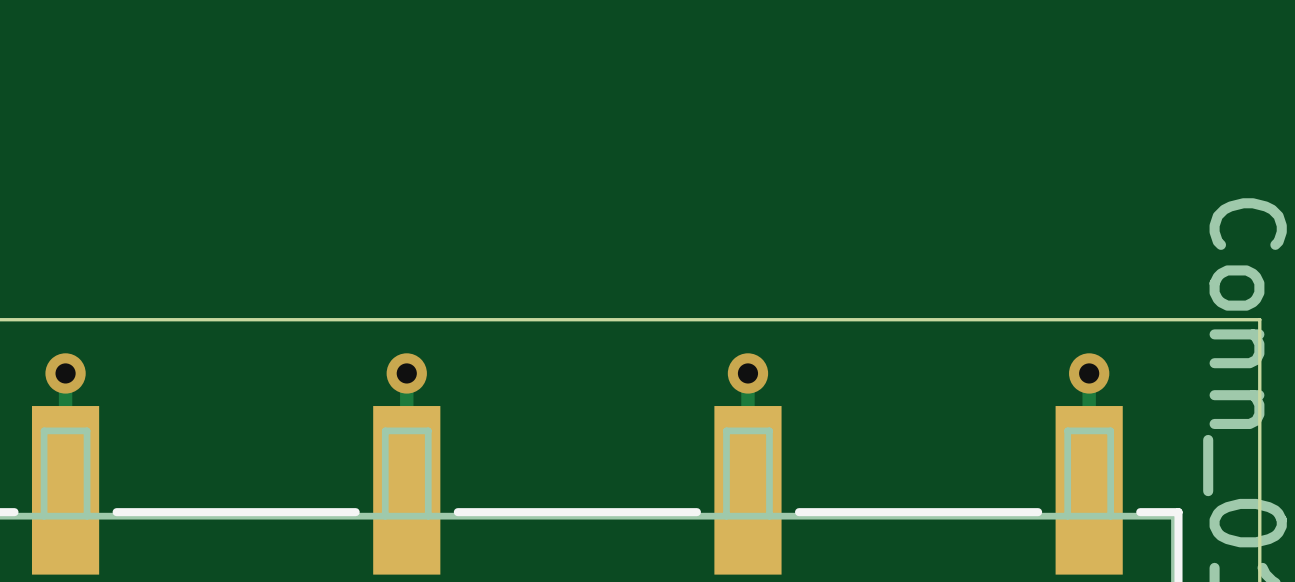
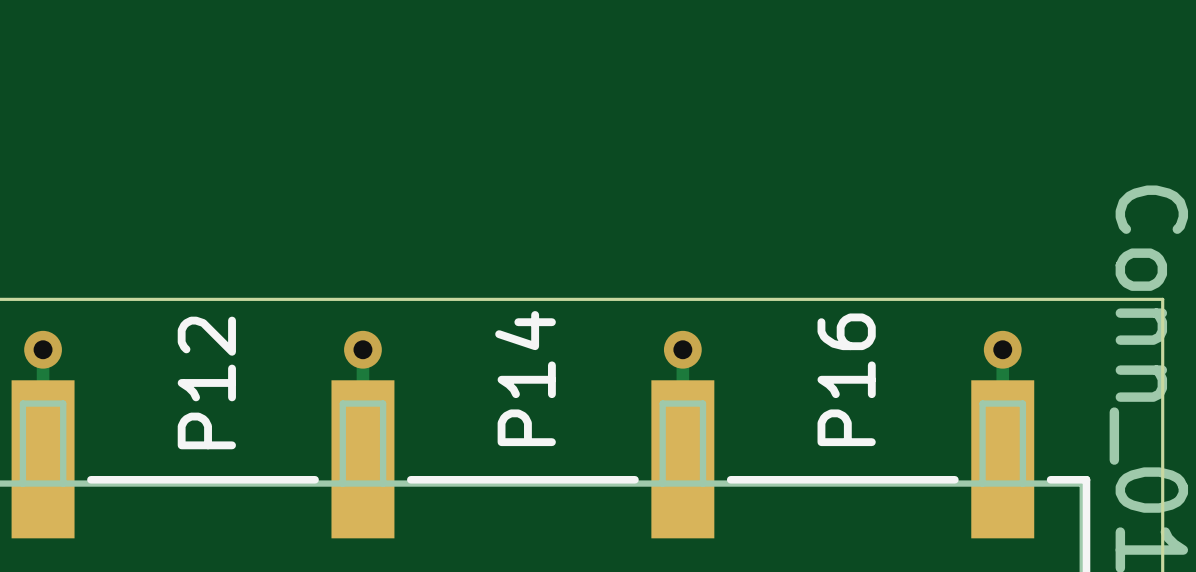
text: none -> P14 (525, 378)
text: none -> P16 (846, 379)
text: none -> P12 (206, 382)

